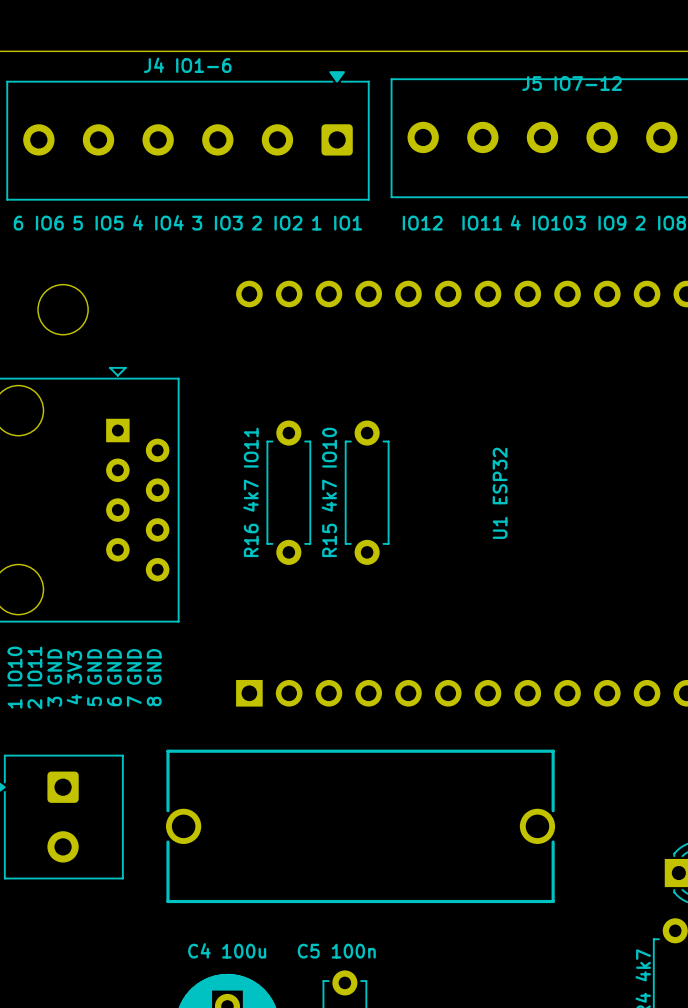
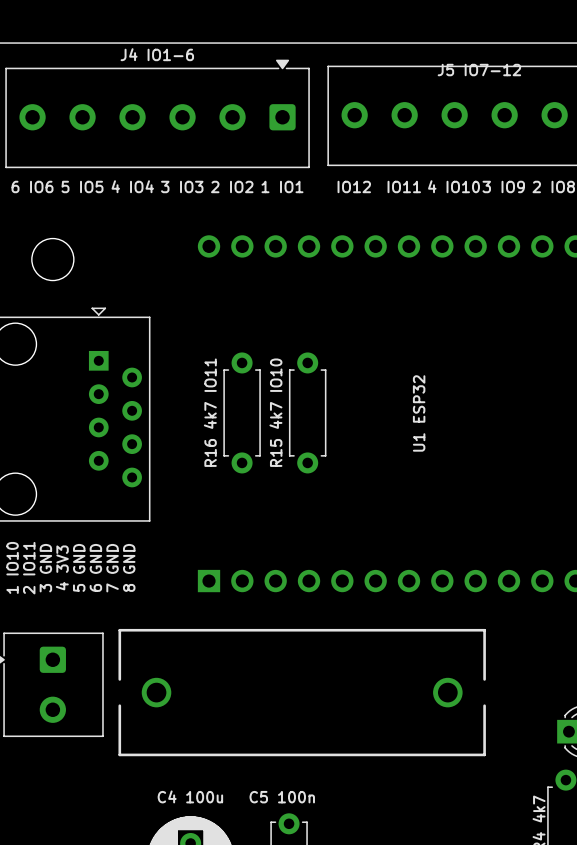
part footprint: [166, 749, 556, 904] -> [118, 628, 486, 757]

